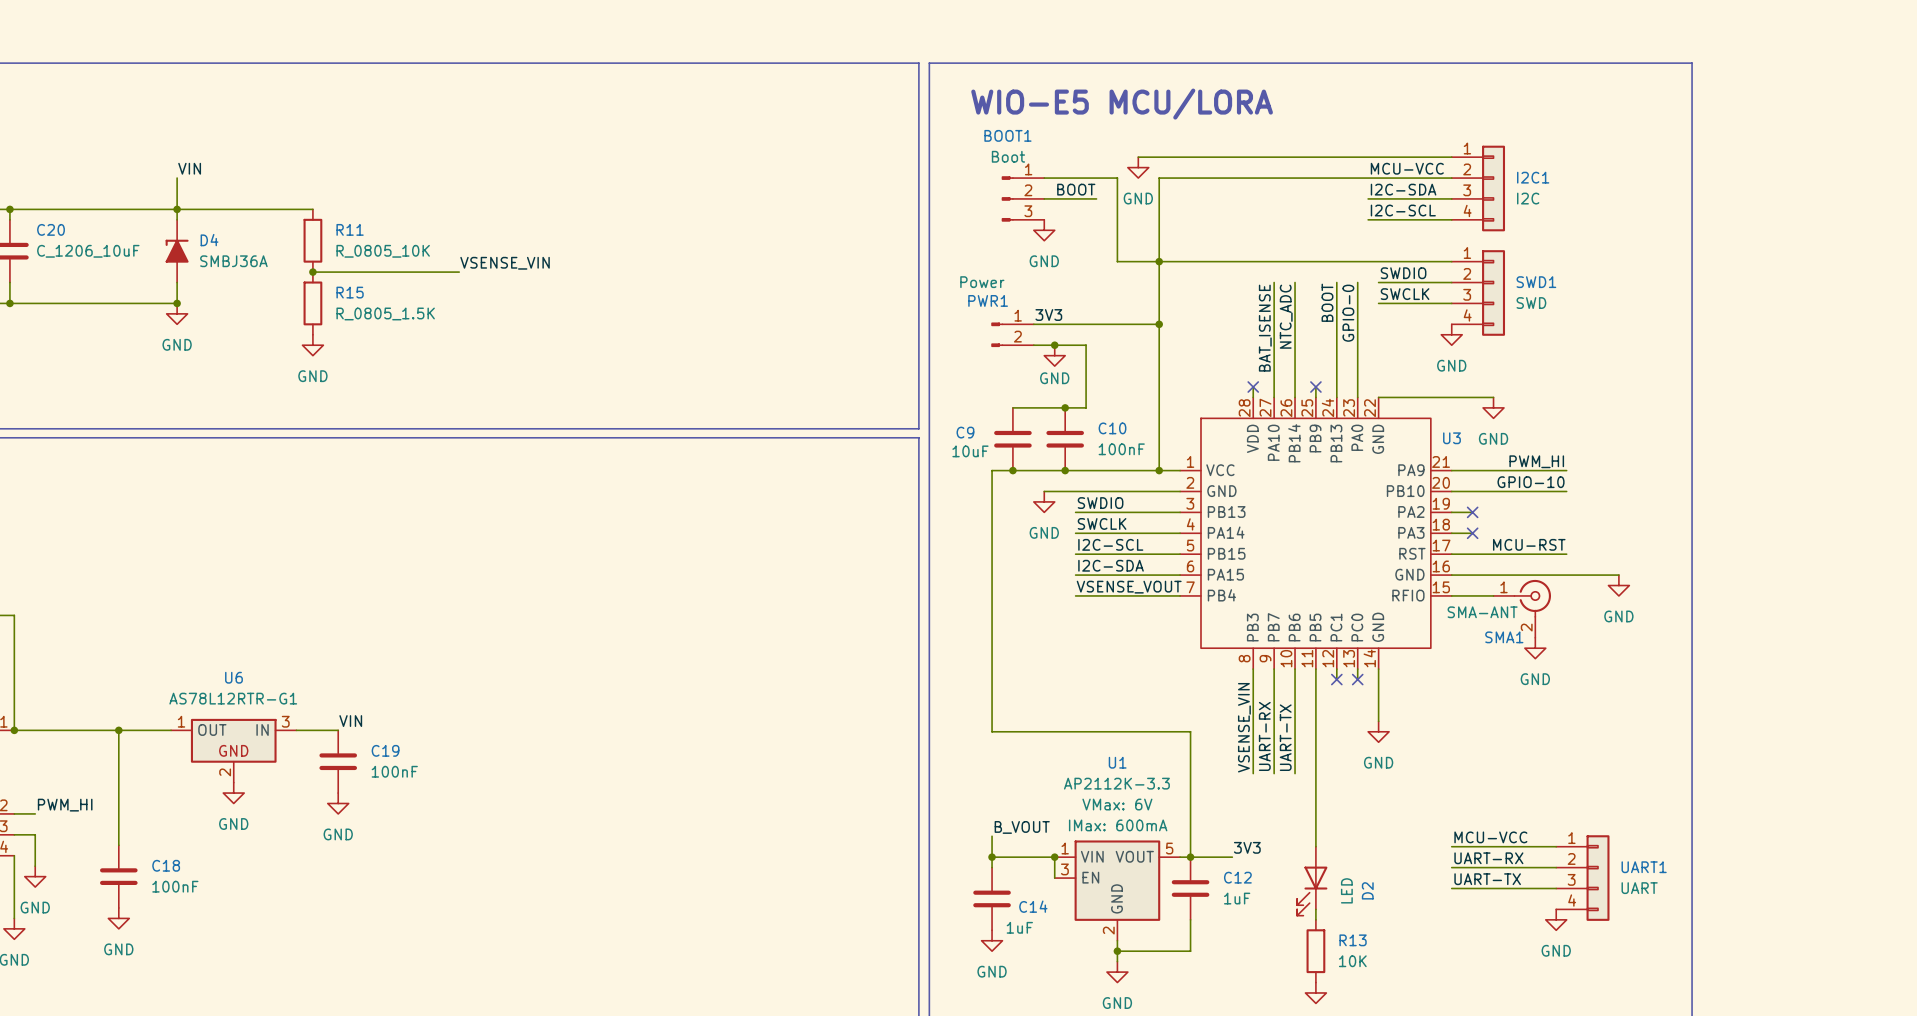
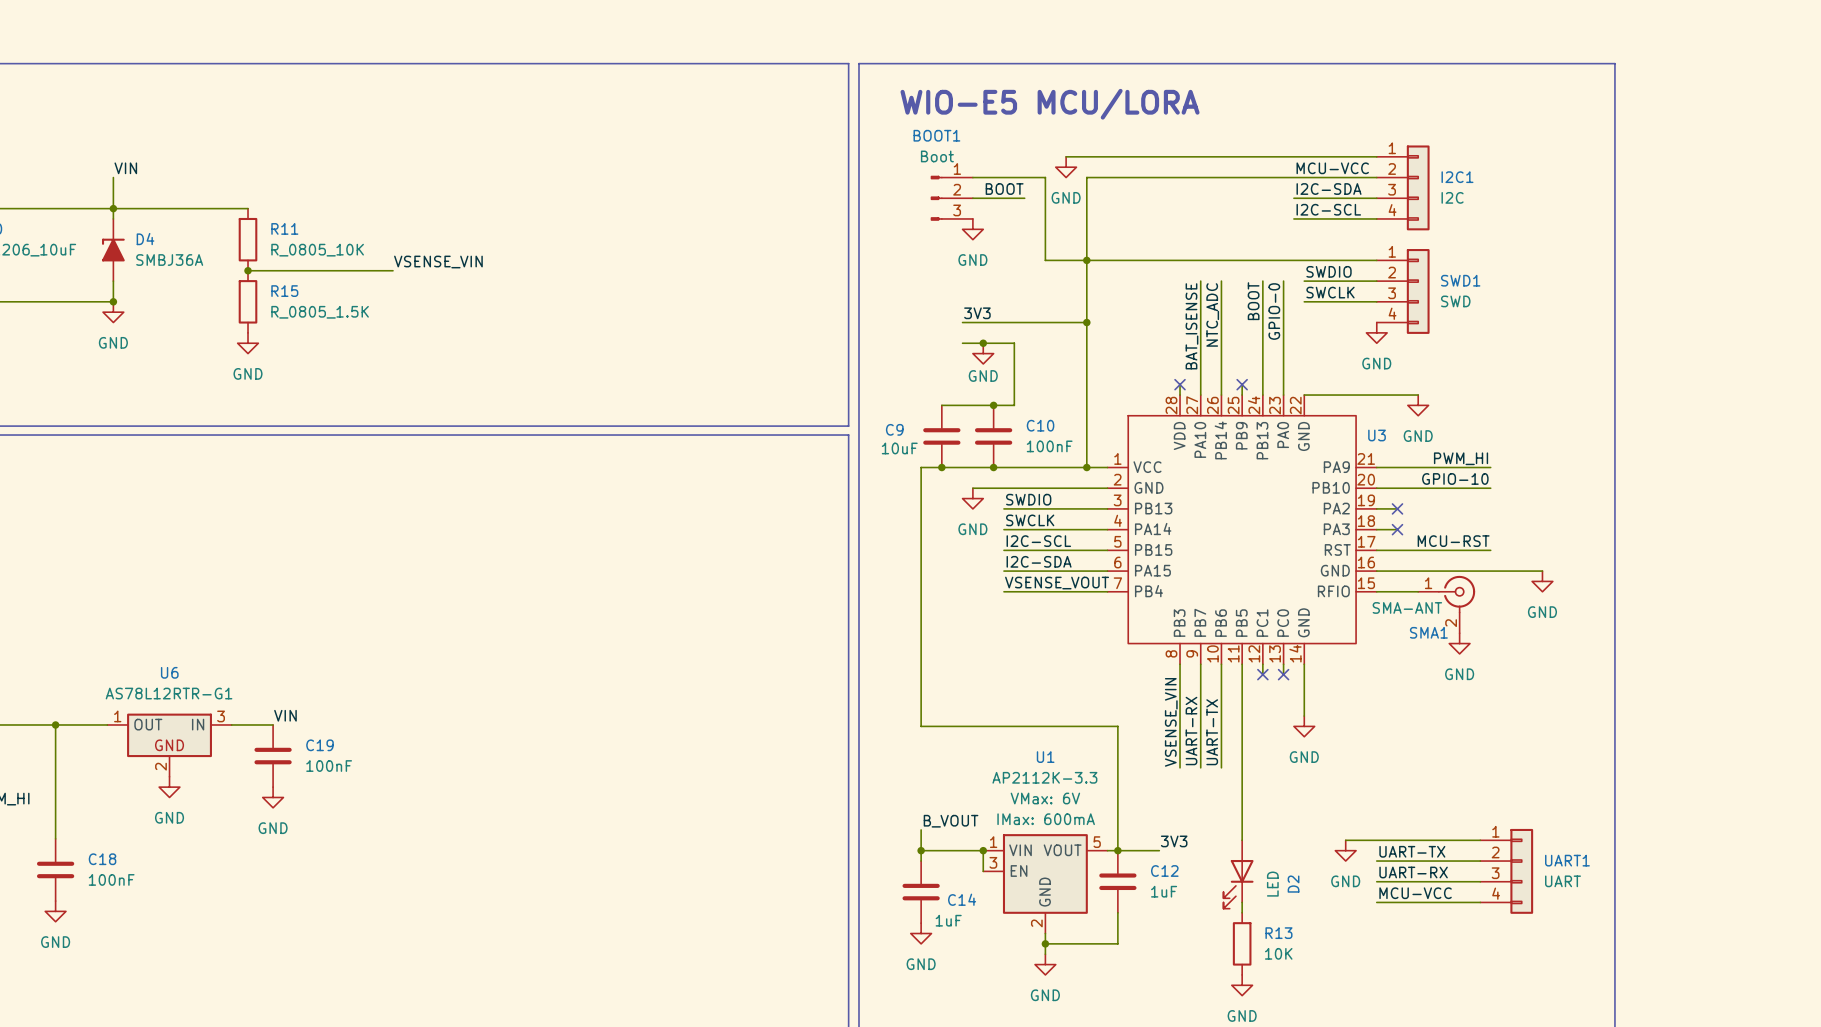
PWR1: Power (1012, 334) -> none
label position: MCU-VCC (1490, 837) -> MCU-VCC (1415, 893)
wire: none -> (1345, 840) (1376, 840)
label: UART-RX (1488, 858) -> UART-TX (1412, 851)
label: UART-TX (1487, 879) -> UART-RX (1413, 872)
wire: none -> (1376, 902) (1480, 902)
power symbol position: GND (1556, 919) -> GND (1345, 850)

